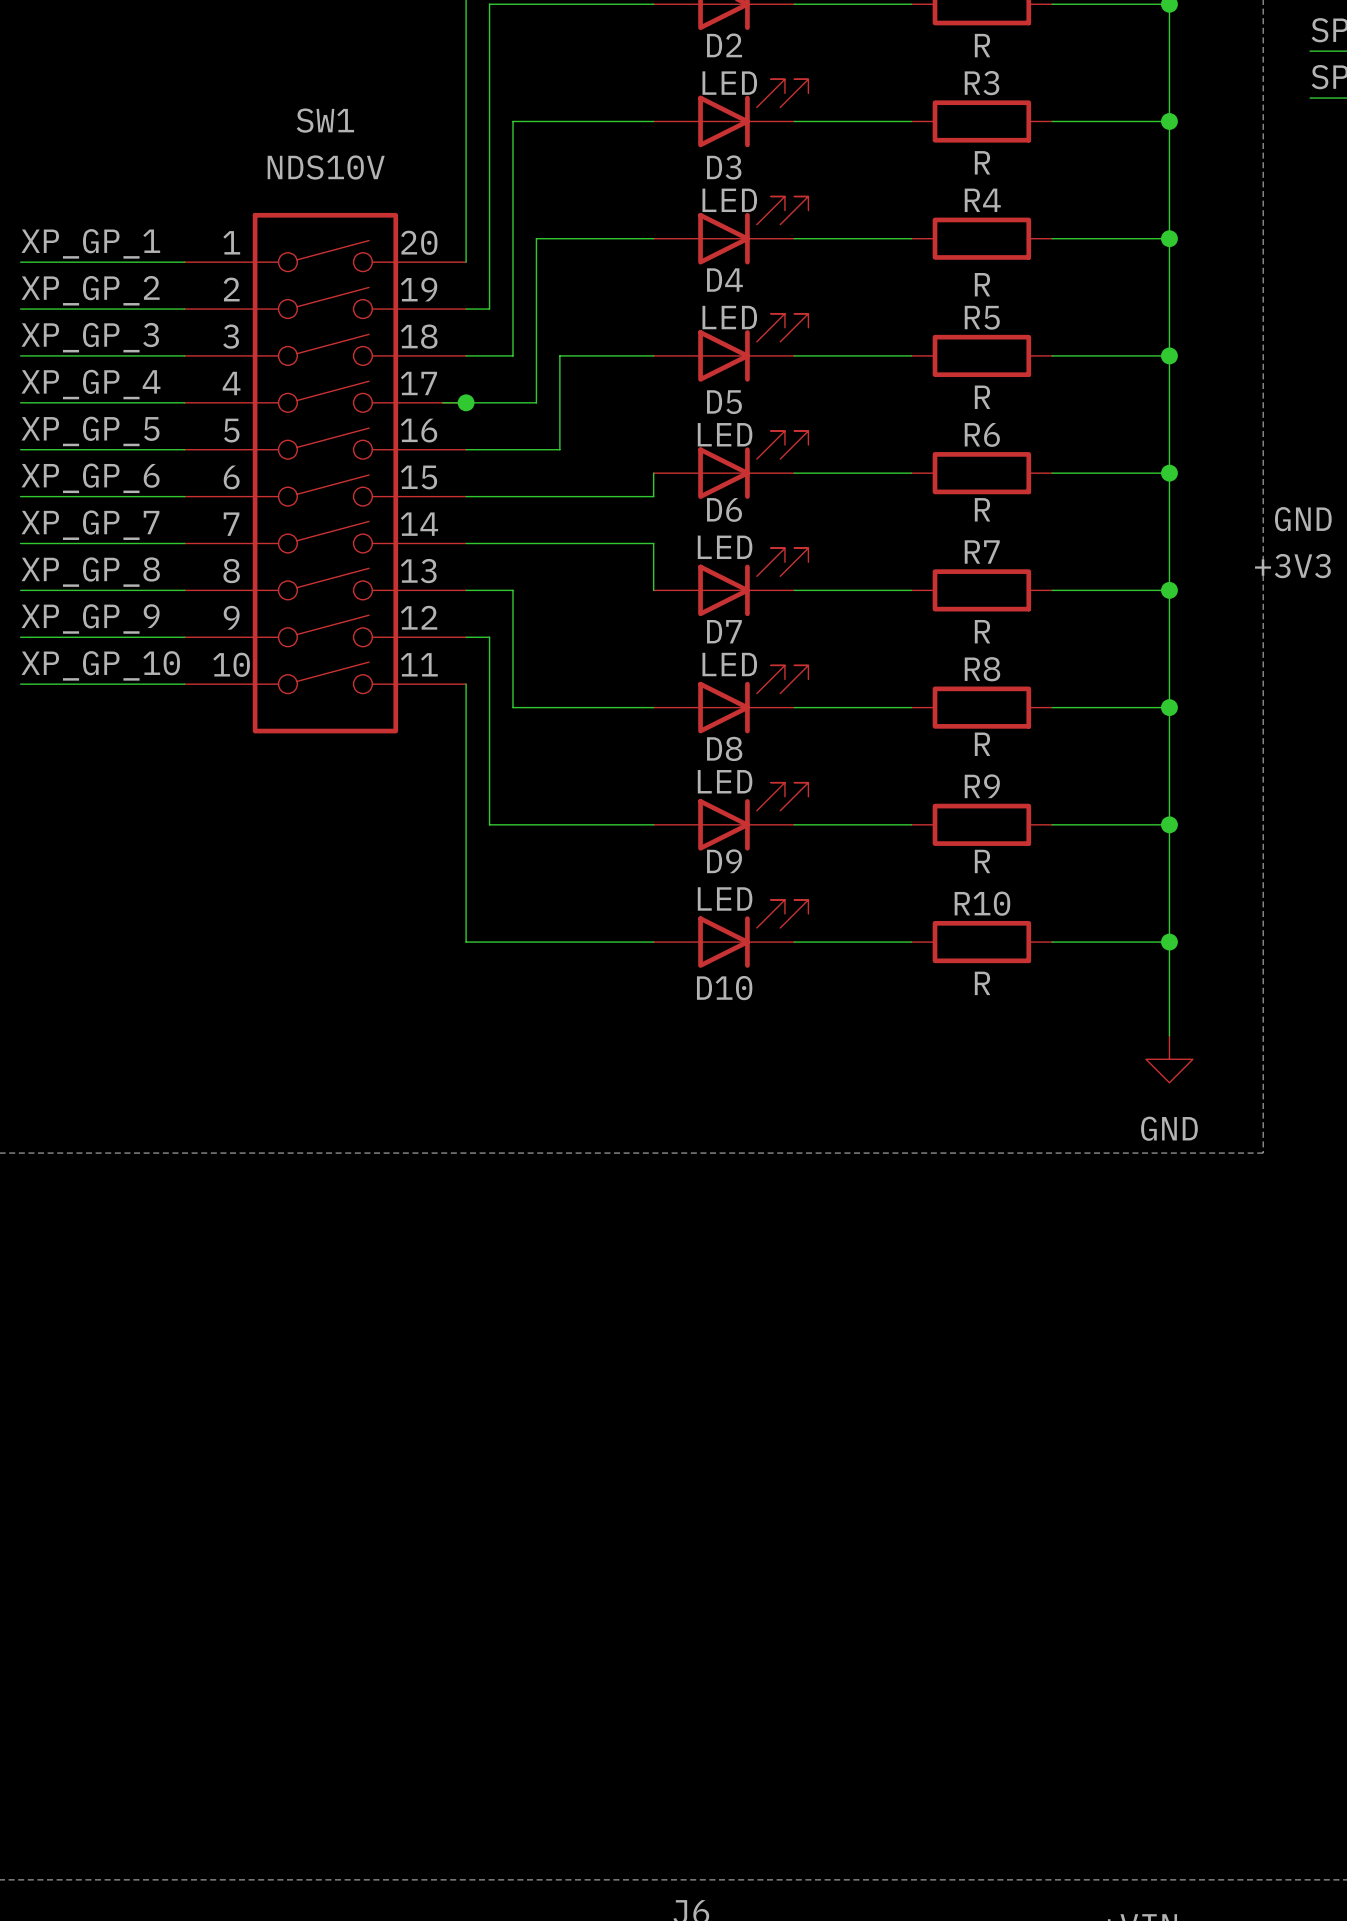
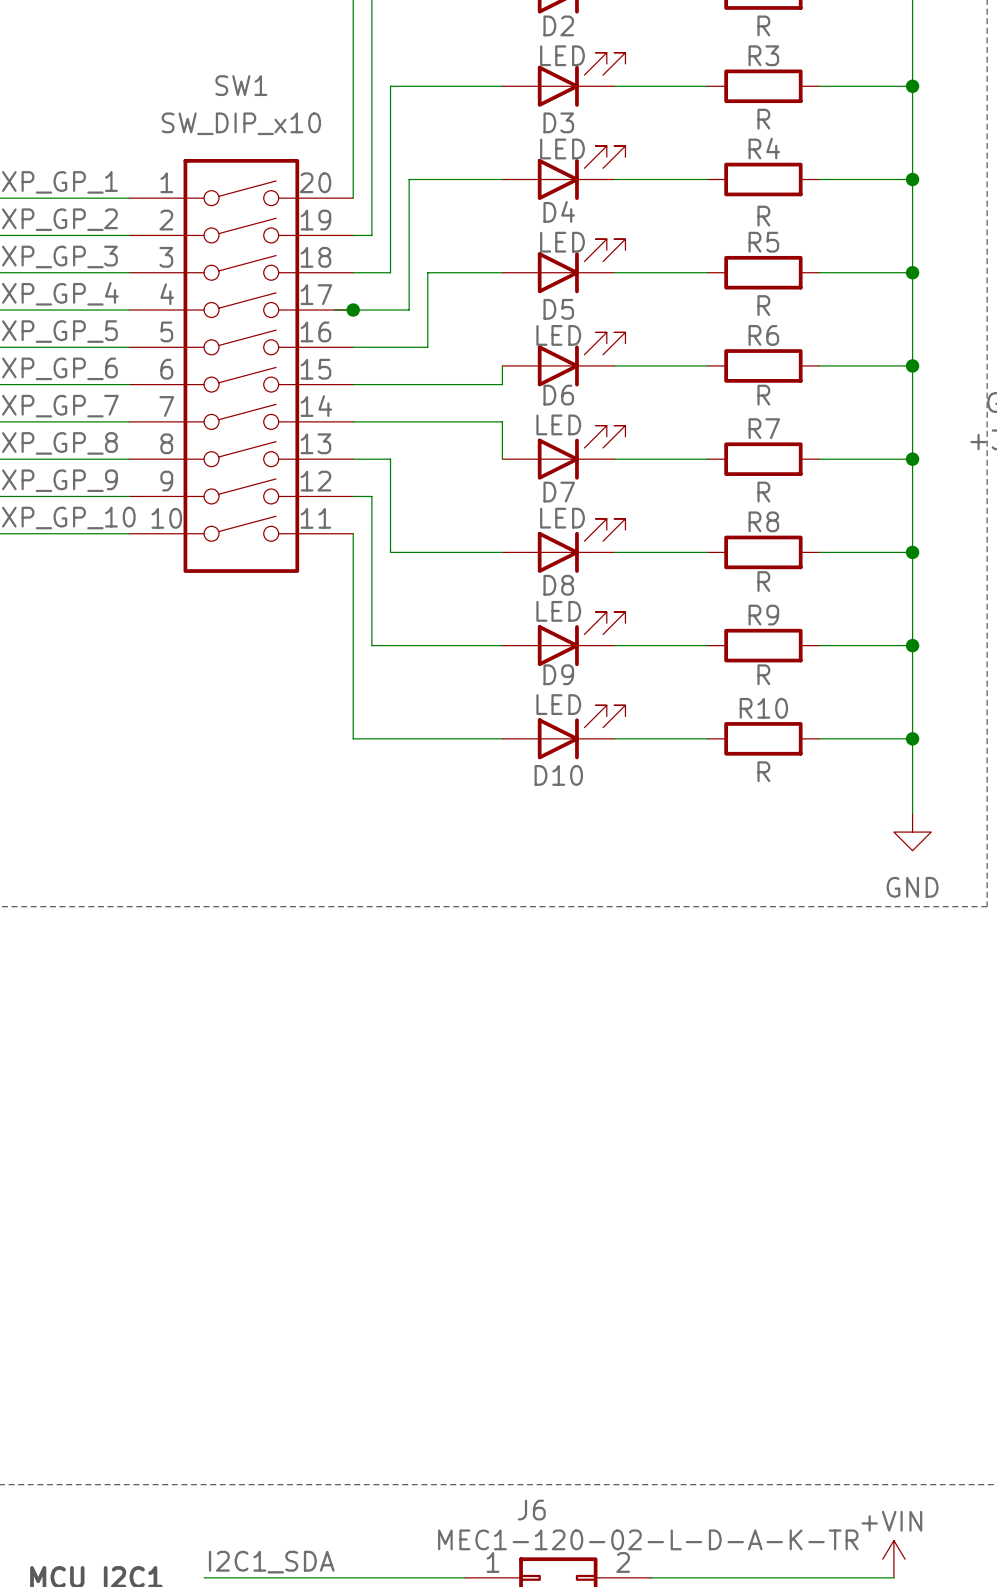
SW1 value: NDS10V (326, 167) -> SW_DIP_x10 (241, 123)

